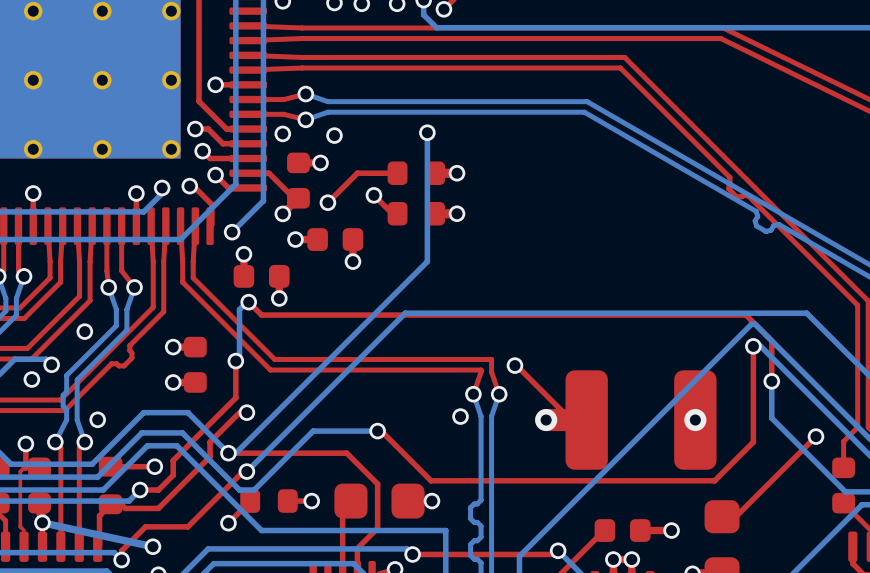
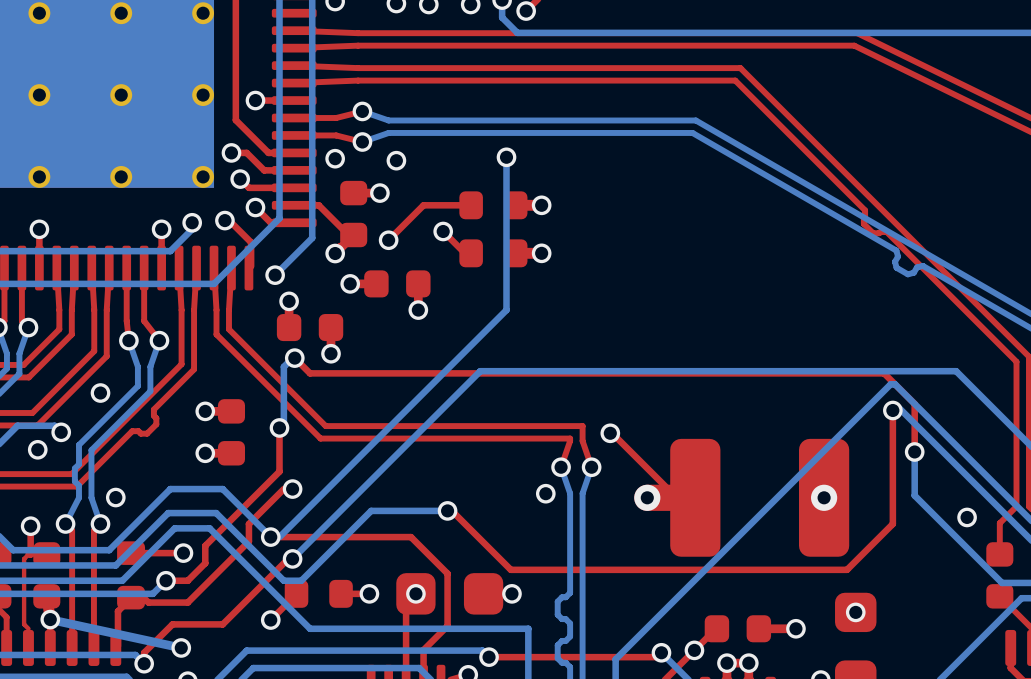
top track: (815, 436) (736, 515) -> none
via: none -> (415, 593)
via: none -> (855, 612)
via: none -> (694, 650)

